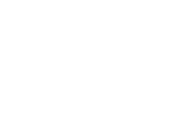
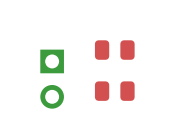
part: none -> (114, 50)
part: none -> (52, 79)
part: none -> (114, 91)

